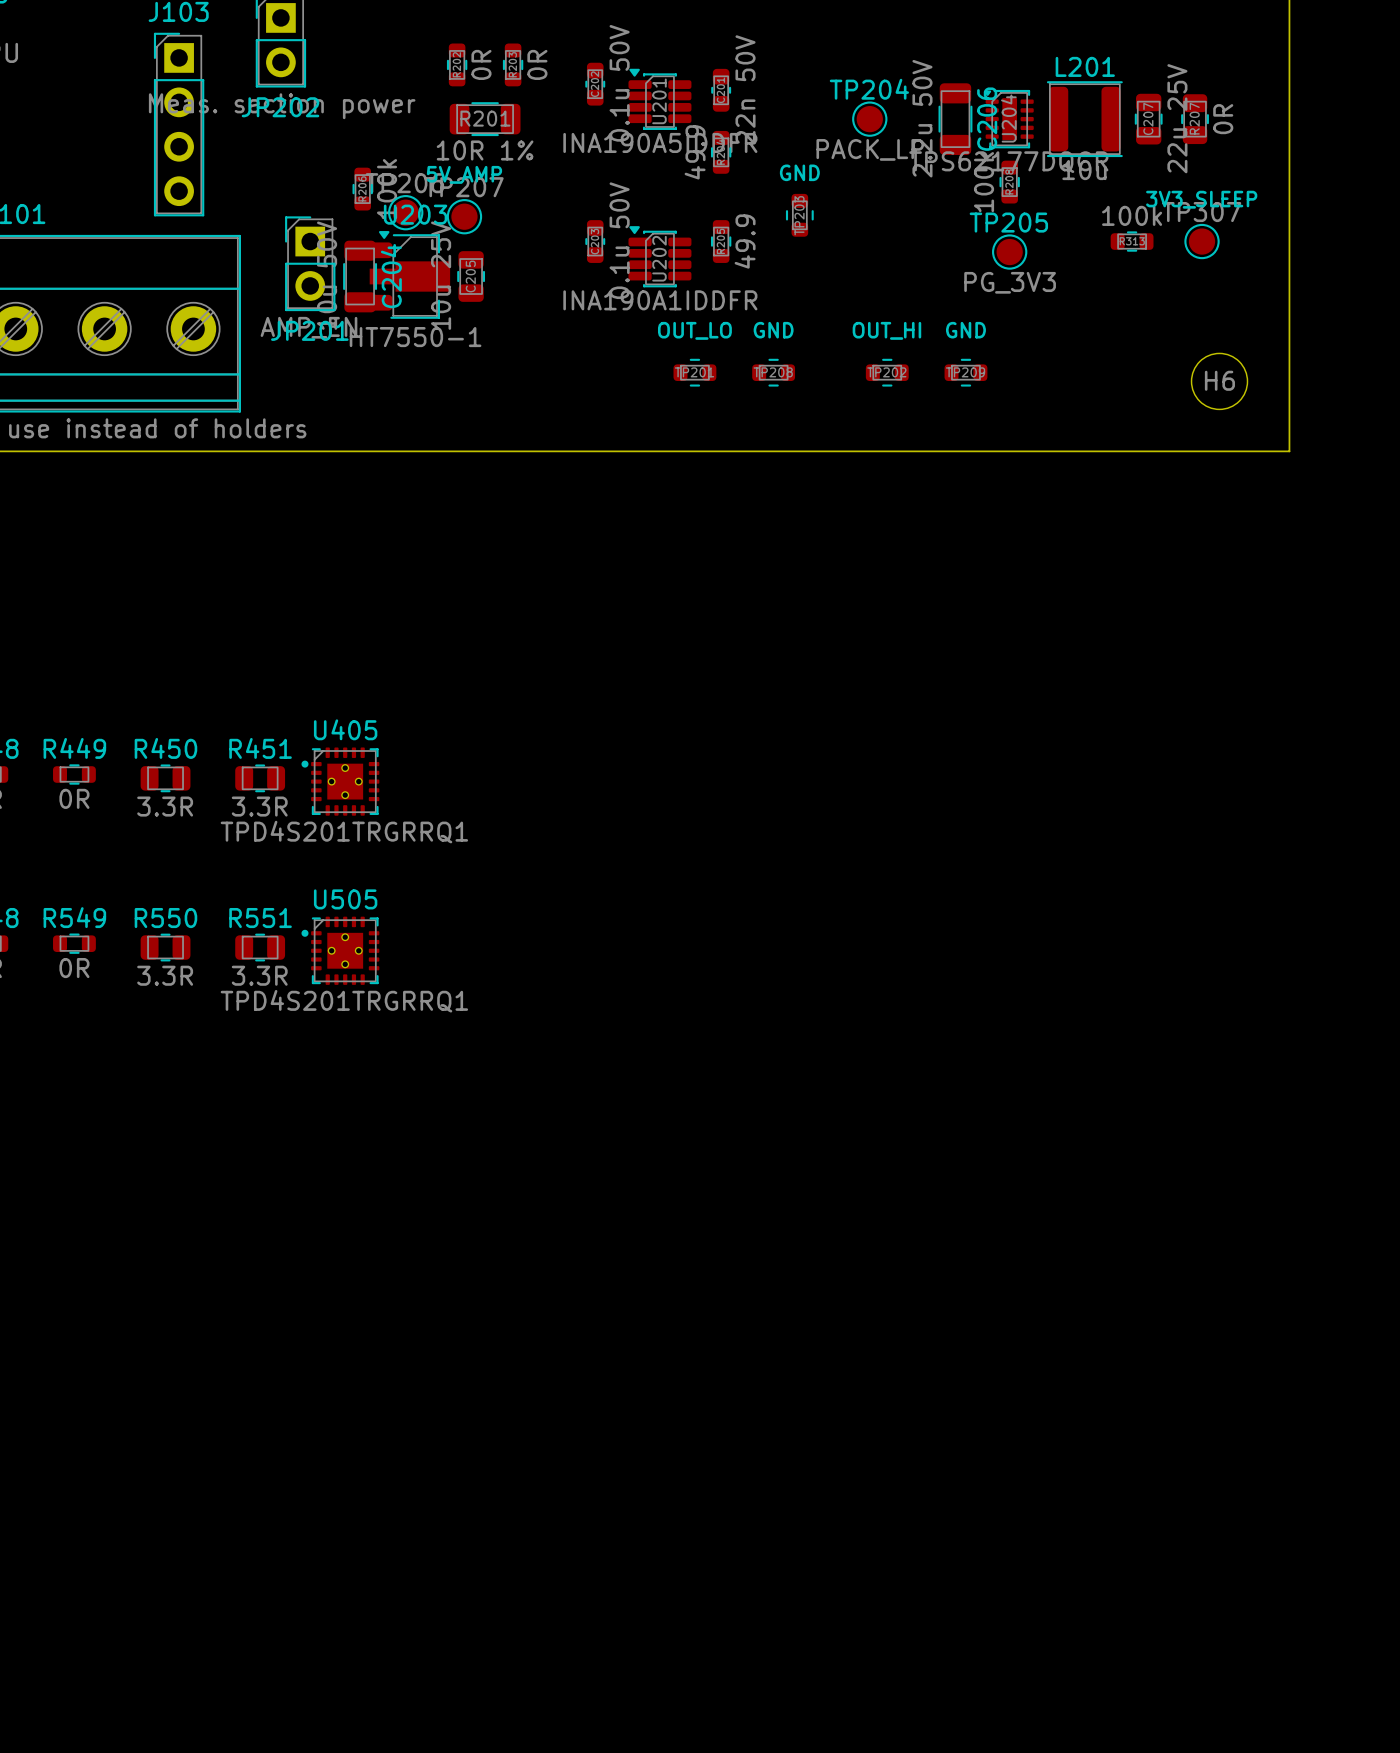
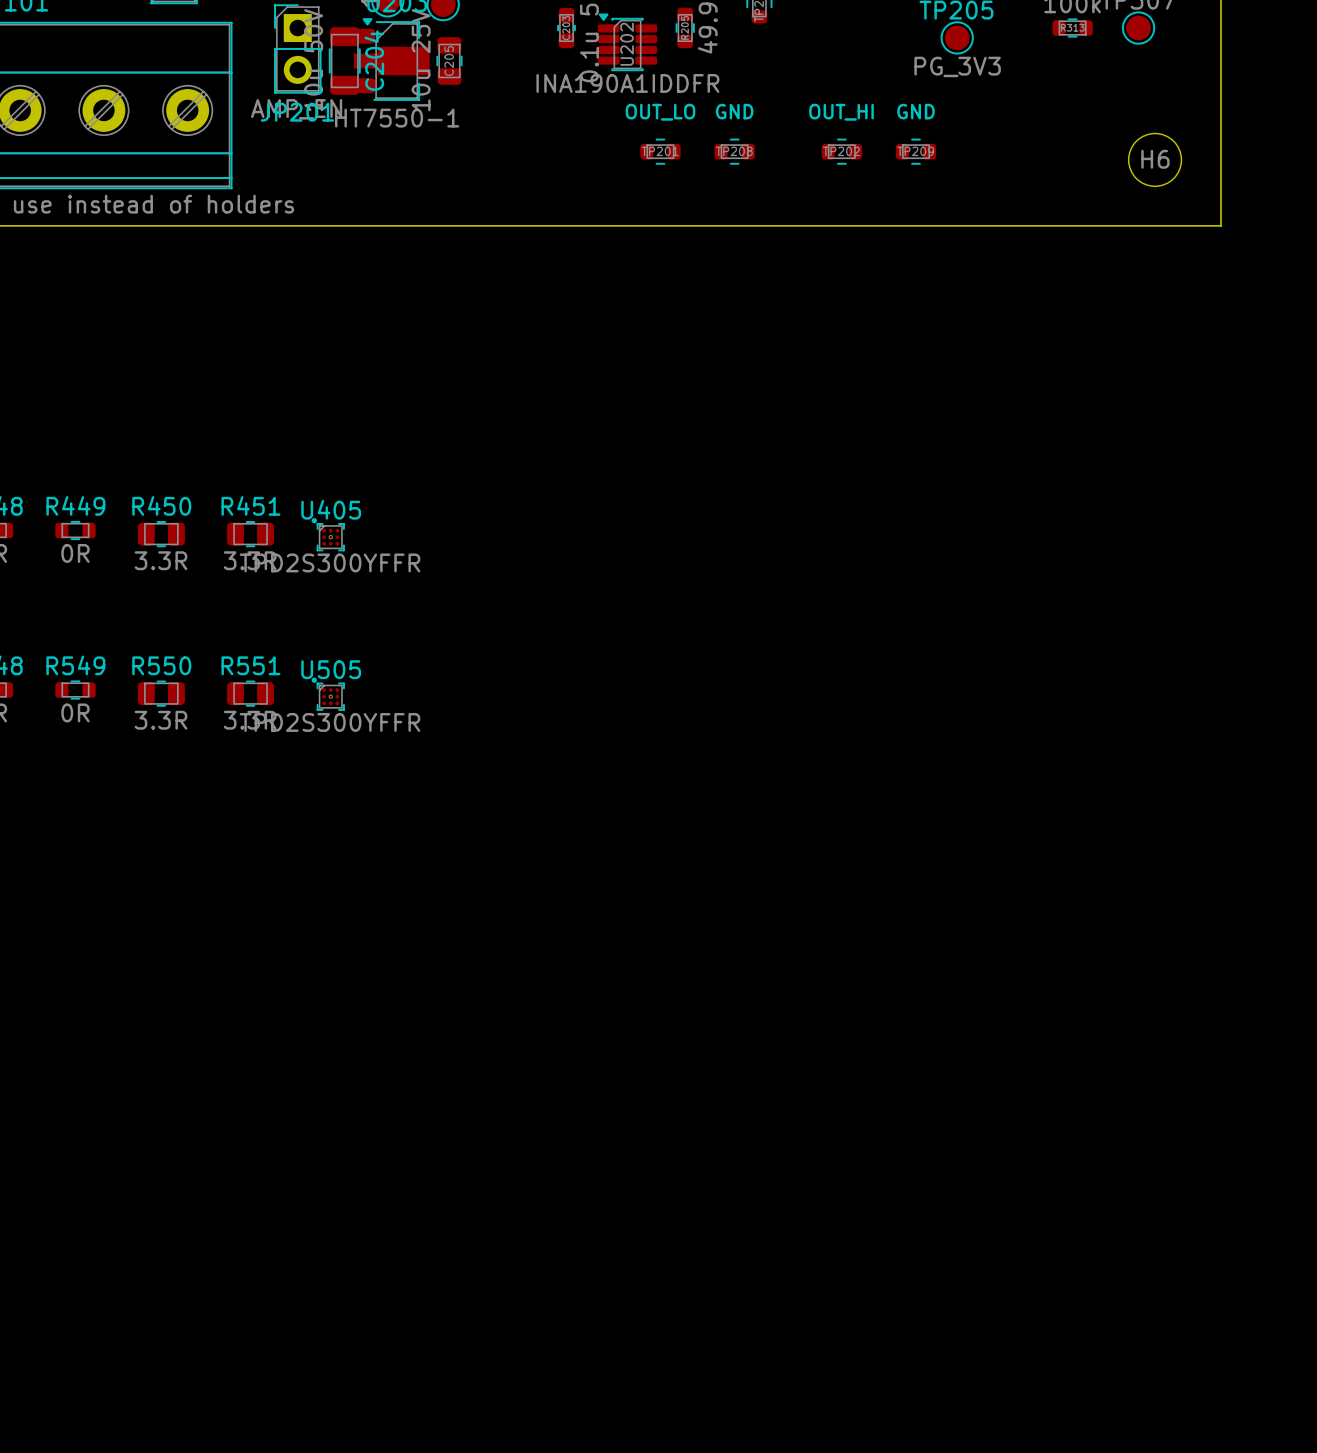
U405 footprint: [301, 747, 380, 816] -> [311, 518, 345, 552]
U405 value: TPD4S201TRGRRQ1 (344, 832) -> TPD2S300YFFR (329, 562)
U505 footprint: [301, 916, 380, 985] -> [311, 677, 345, 711]
U505 value: TPD4S201TRGRRQ1 (344, 1001) -> TPD2S300YFFR (329, 722)

